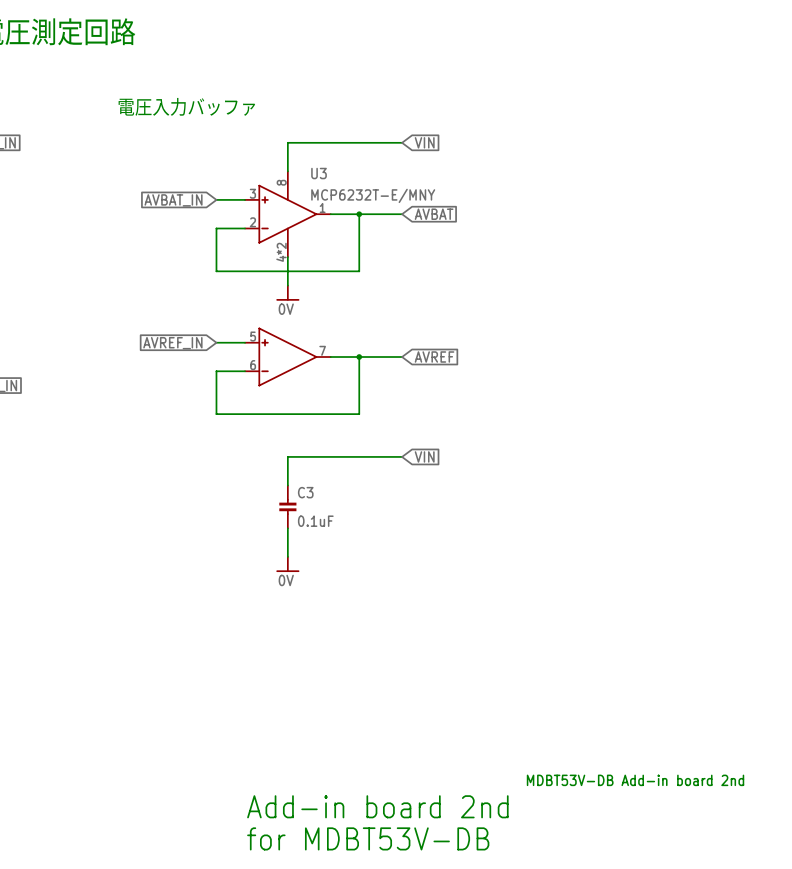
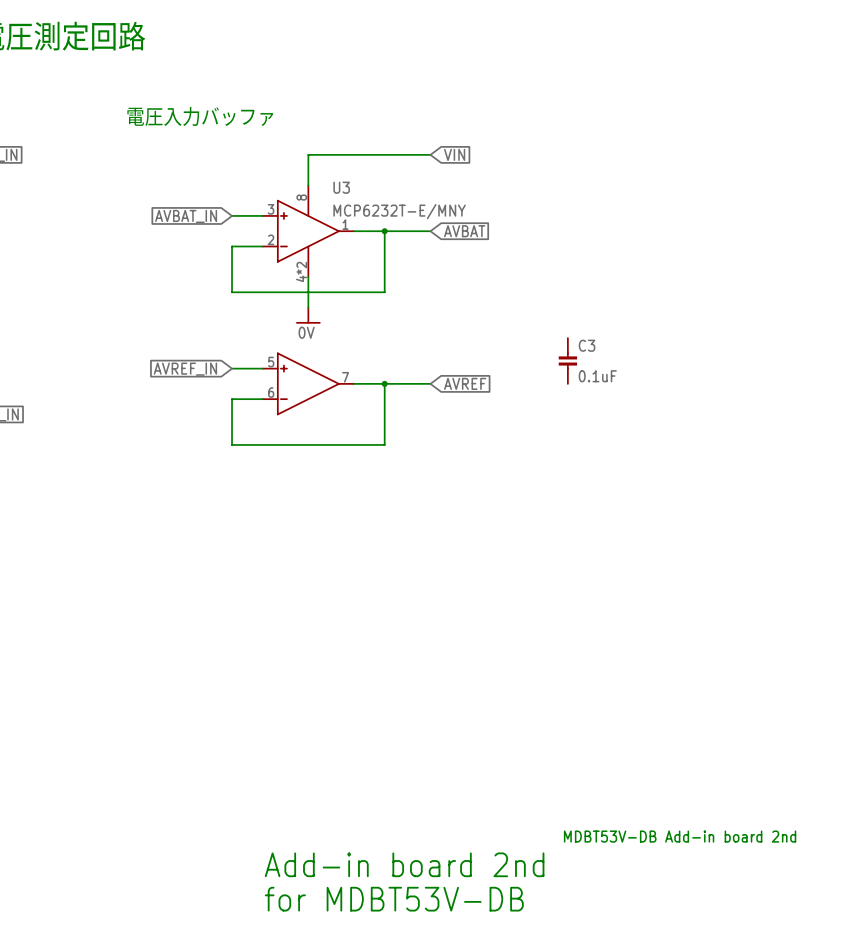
wire: (402, 456) (287, 456) (287, 485) -> none
global label: VIN (424, 456) -> none
C3 position: (287, 506) -> (567, 360)
wire: (287, 528) (287, 556) -> none
power symbol: 0V (287, 564) -> none

